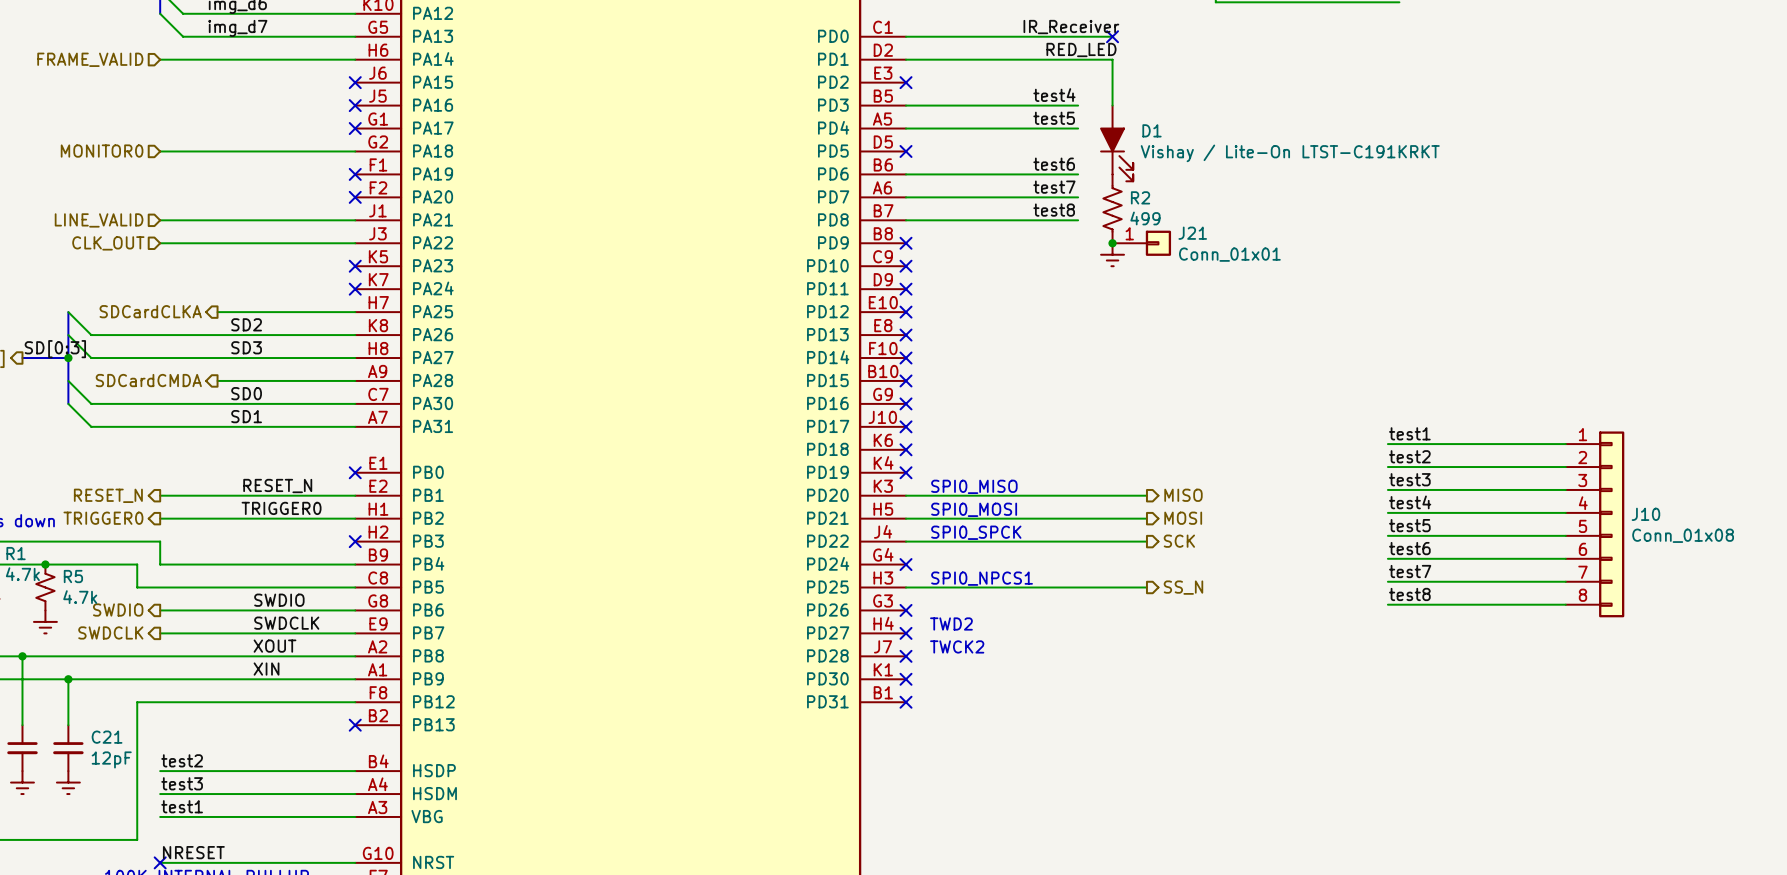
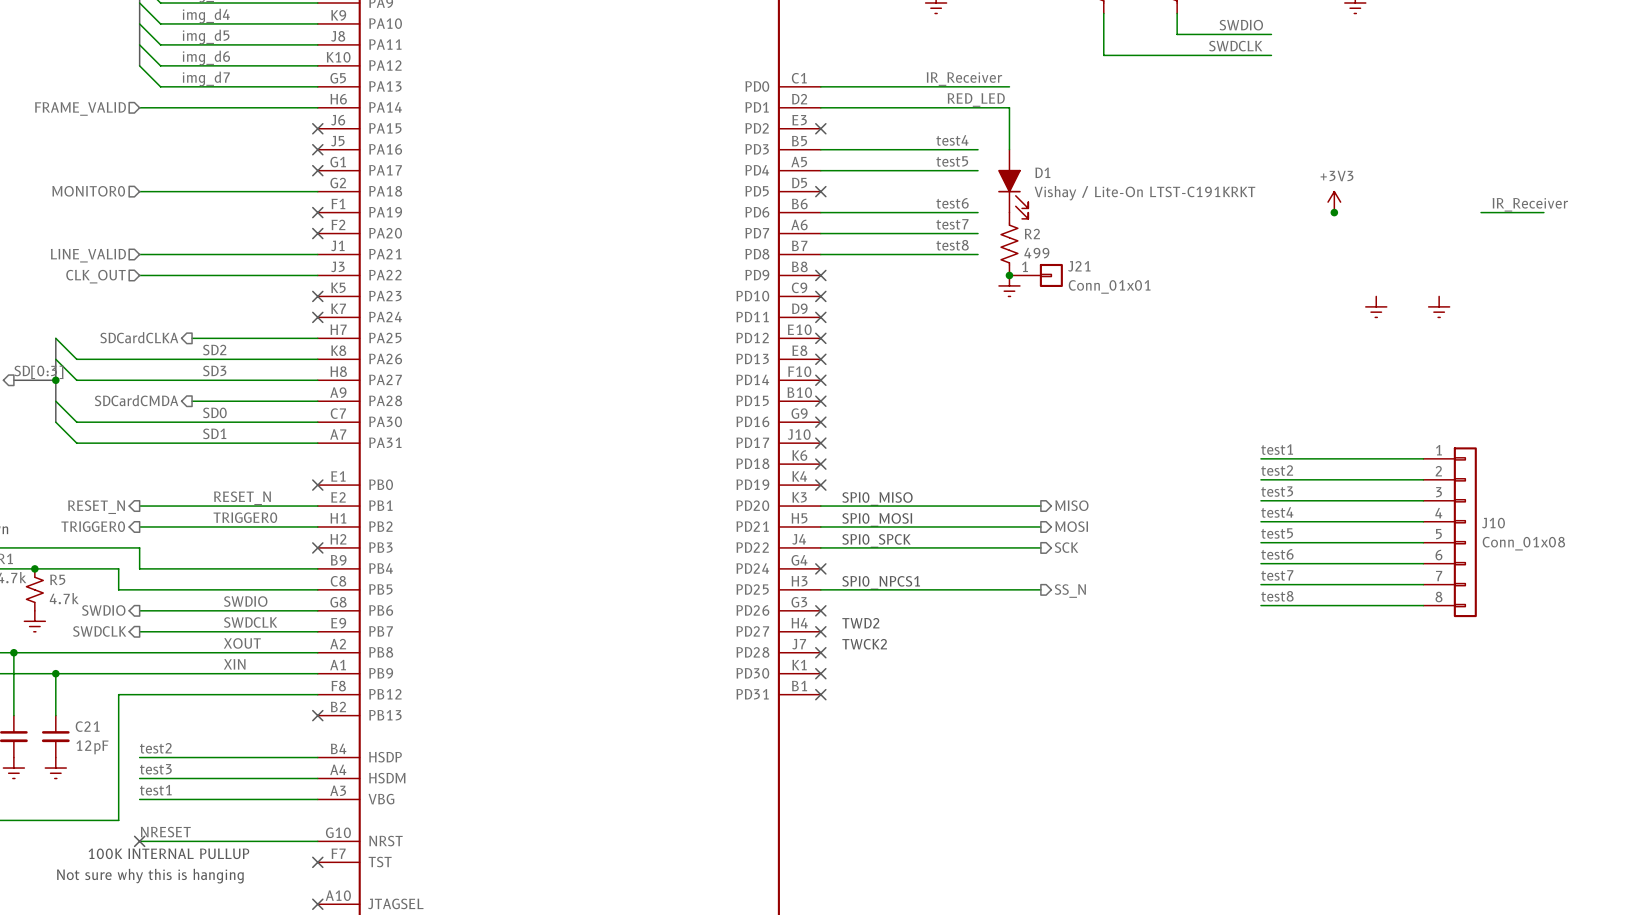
no-connect mark: (1112, 36) -> none
power symbol: none -> +3V3 (1334, 202)
label: none -> IR_Receiver (1530, 204)
junction: none -> (1334, 212)
wire: none -> (1481, 212) (1543, 212)
power symbol: none -> (1376, 306)
power symbol: none -> (1439, 306)

